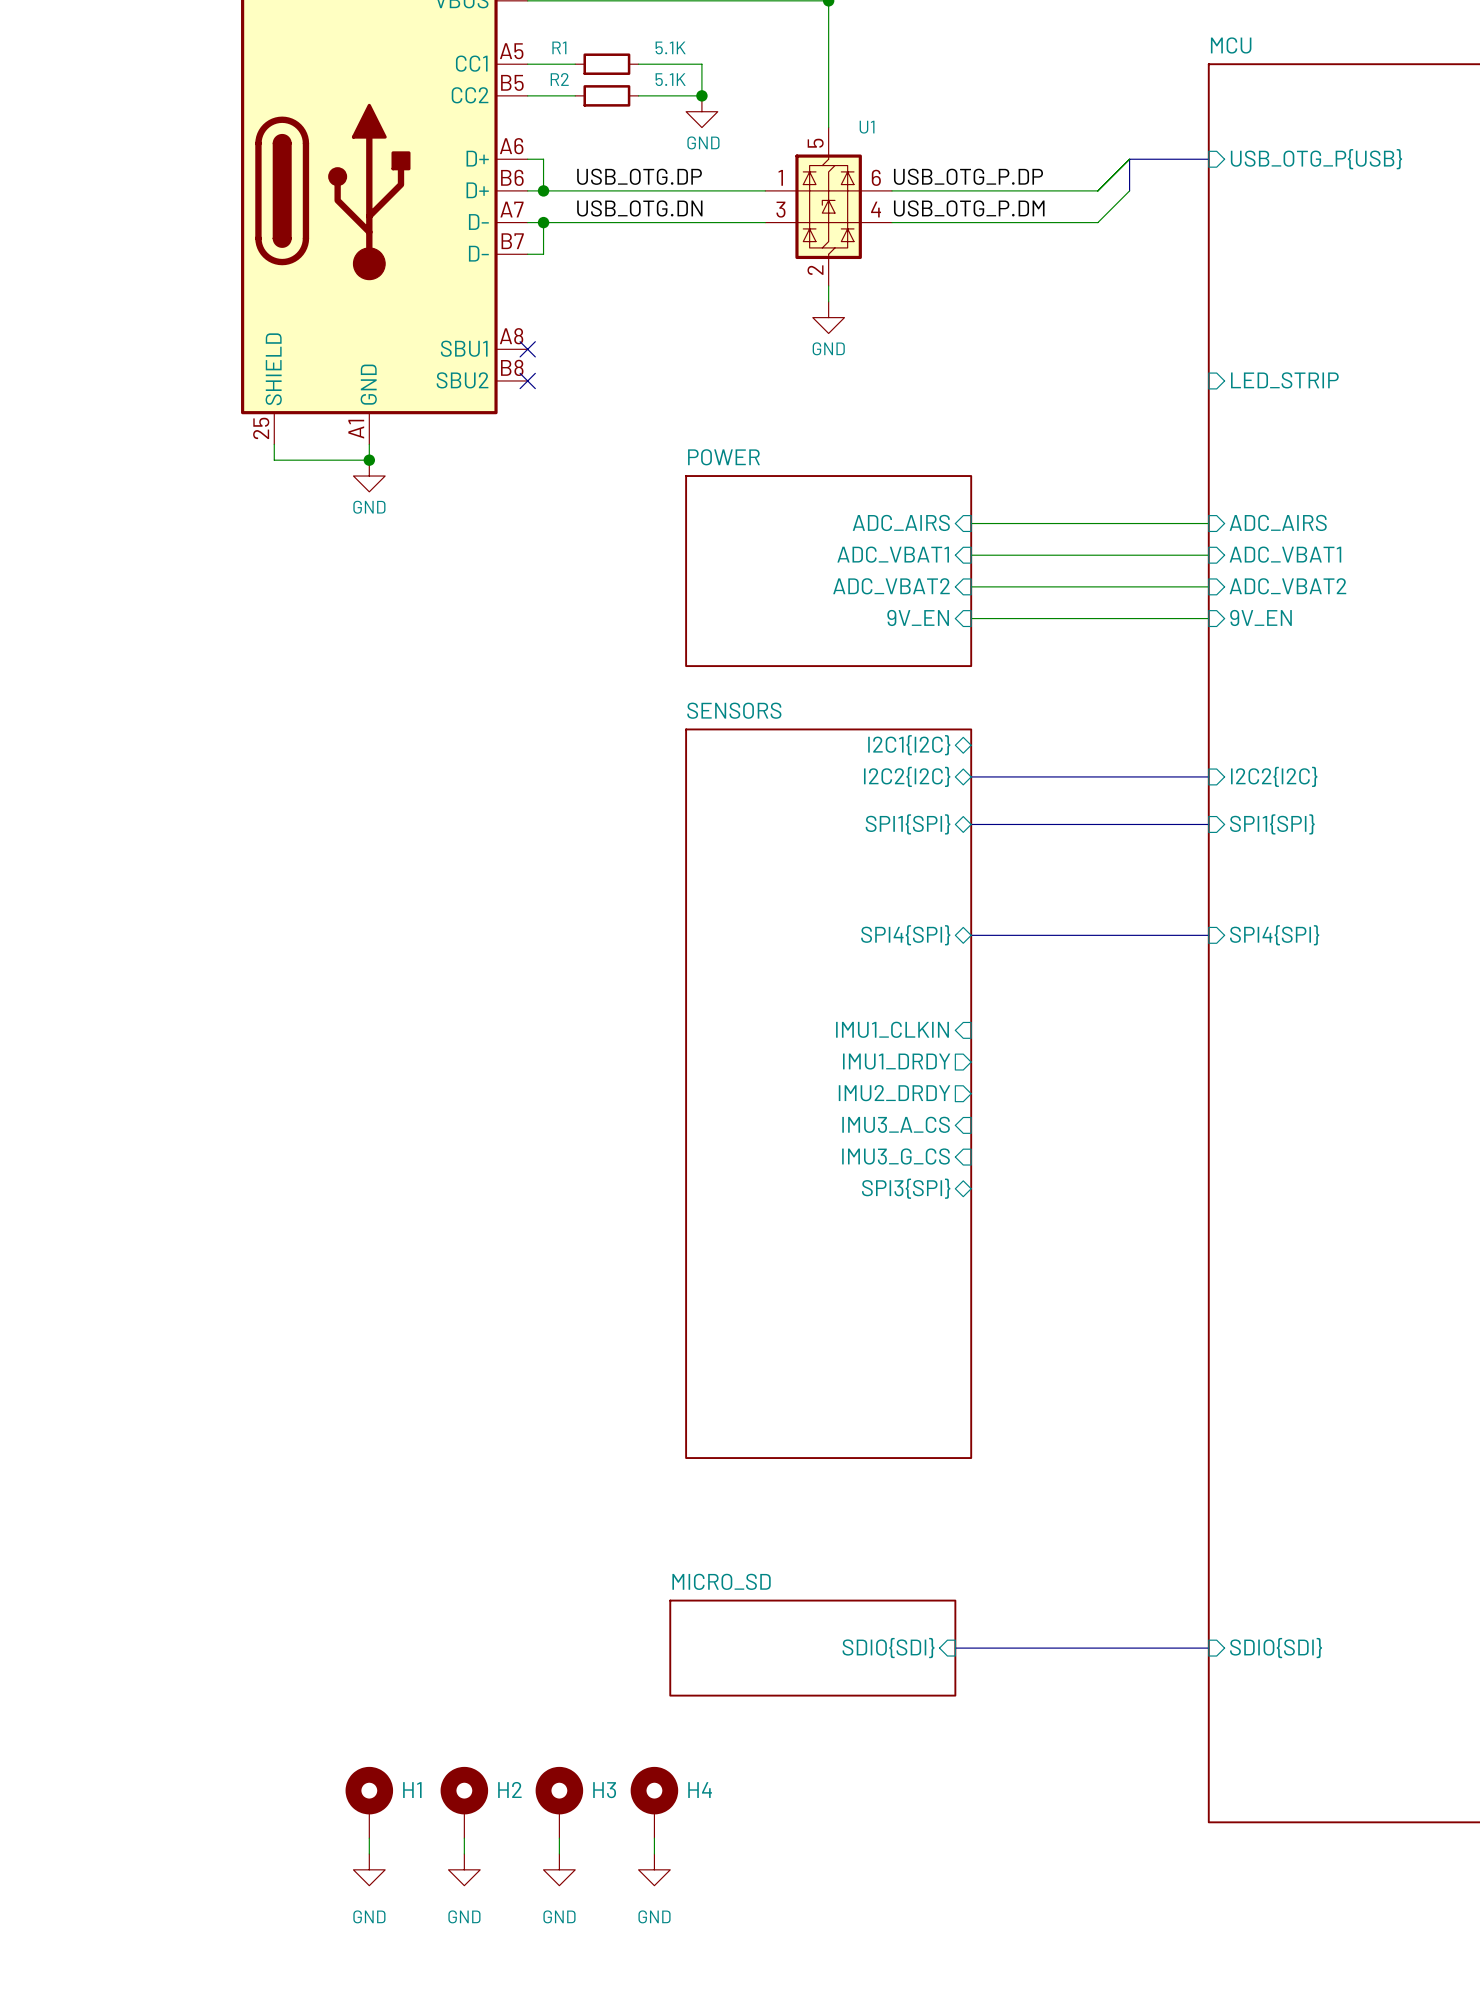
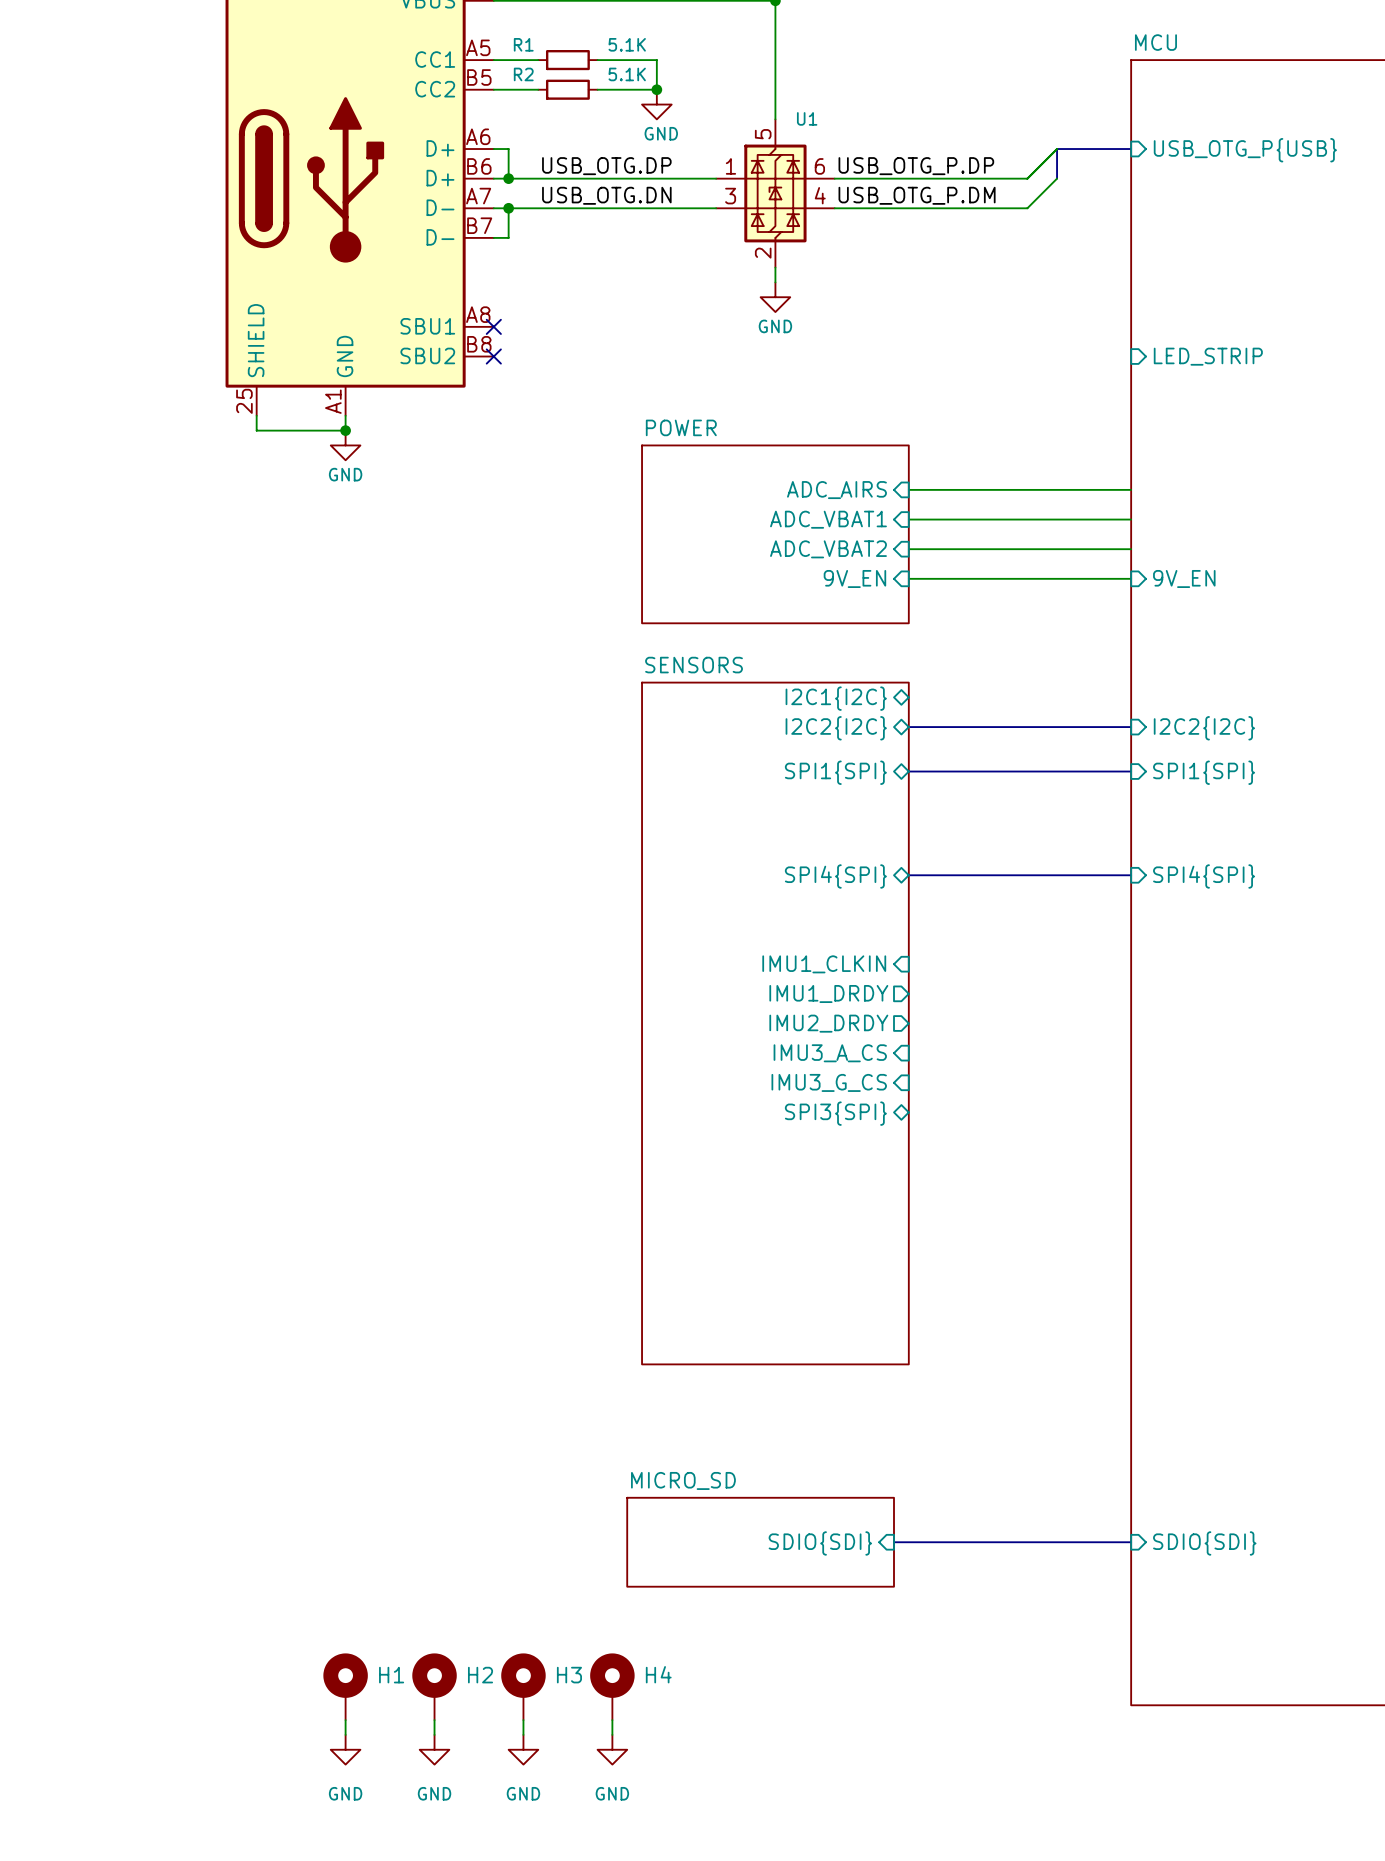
sheet pin: ADC_AIRS (1278, 522) -> none
sheet pin: ADC_VBAT1 (1285, 554) -> none
sheet pin: ADC_VBAT2 (1287, 586) -> none

